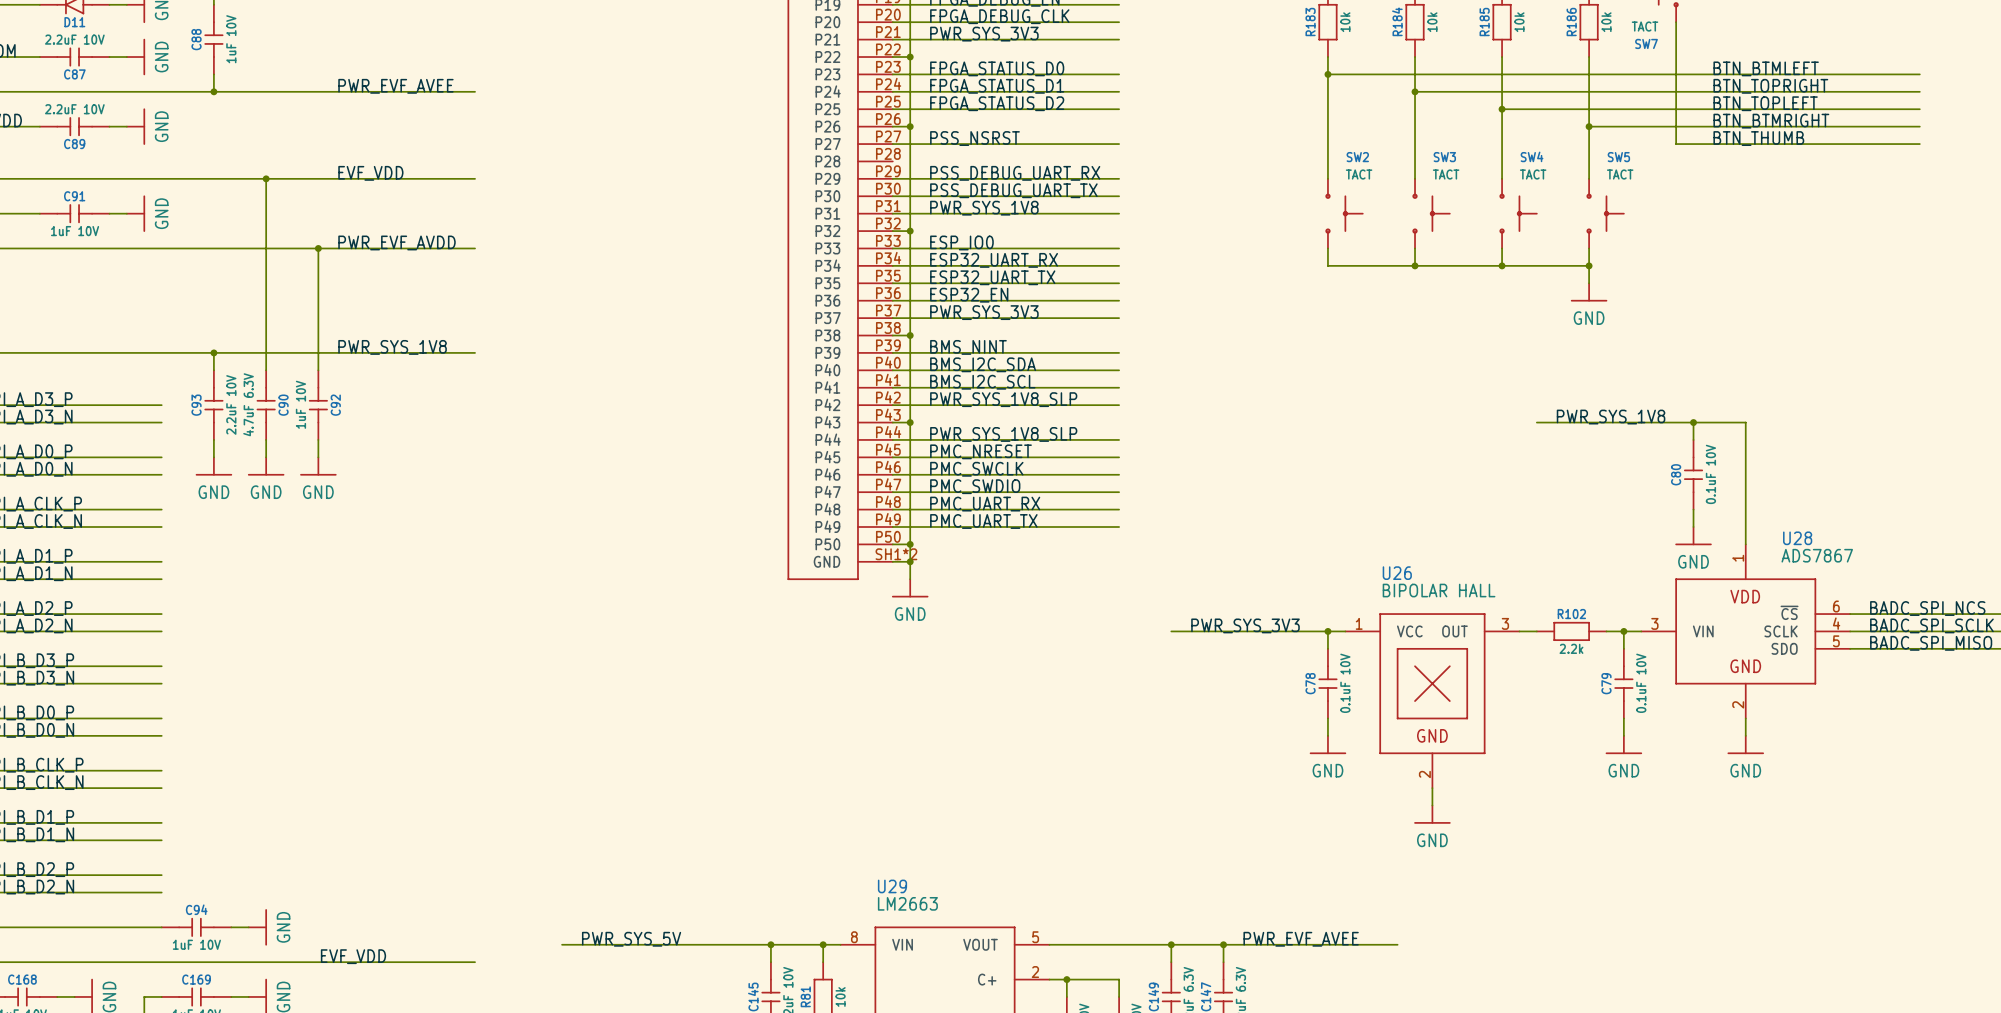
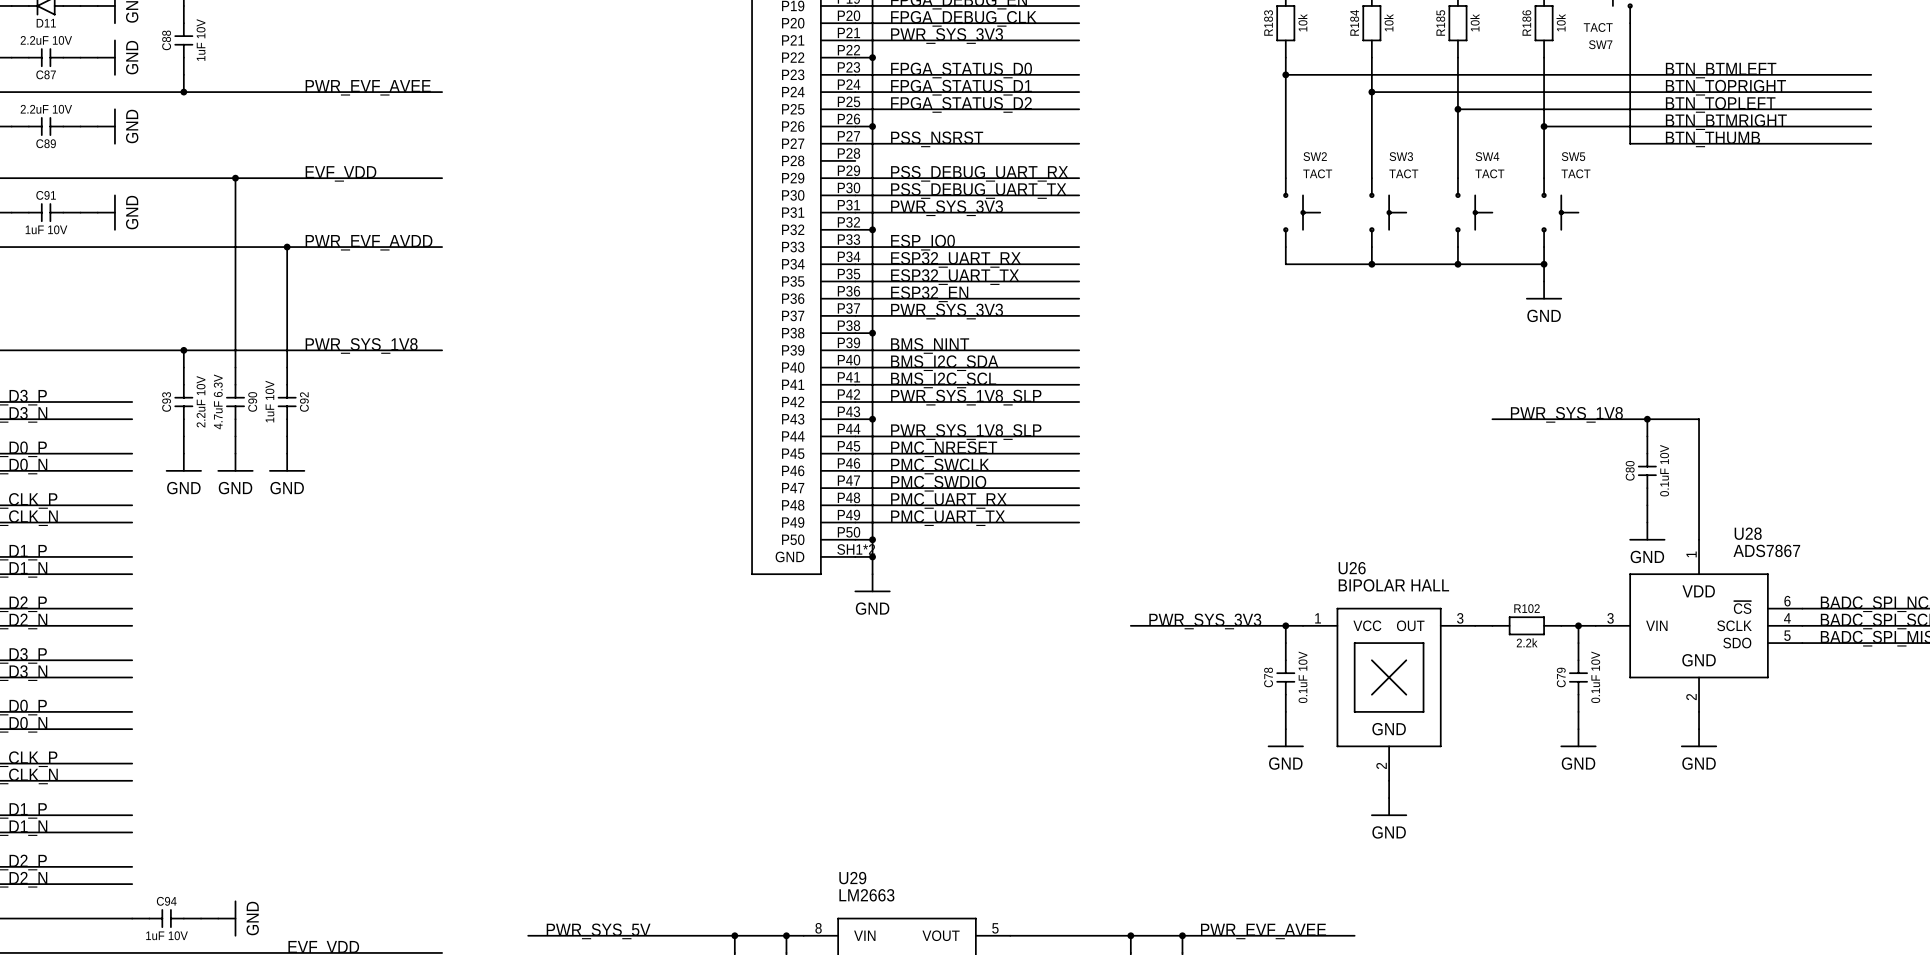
label: PWR_SYS_1V8 (984, 208) -> PWR_SYS_3V3 (947, 208)

